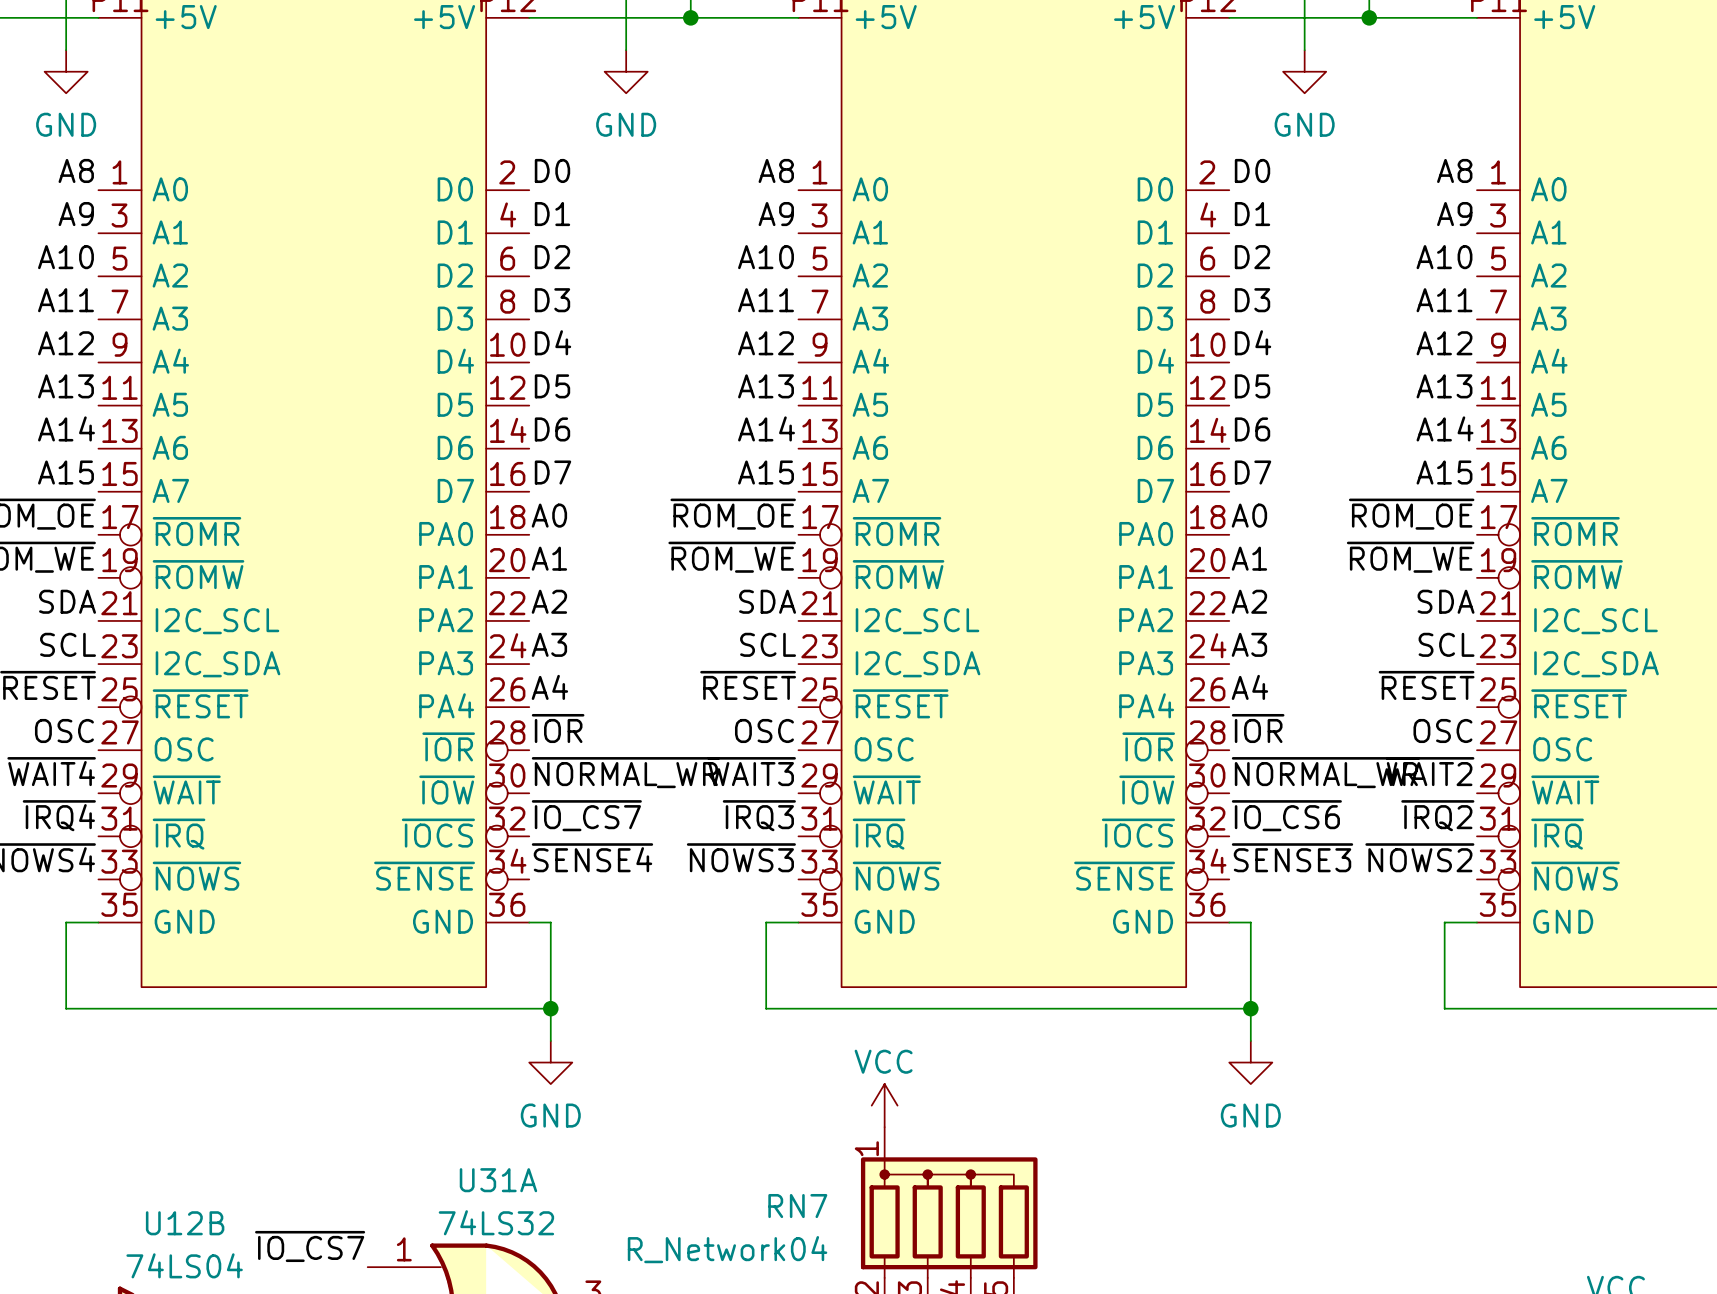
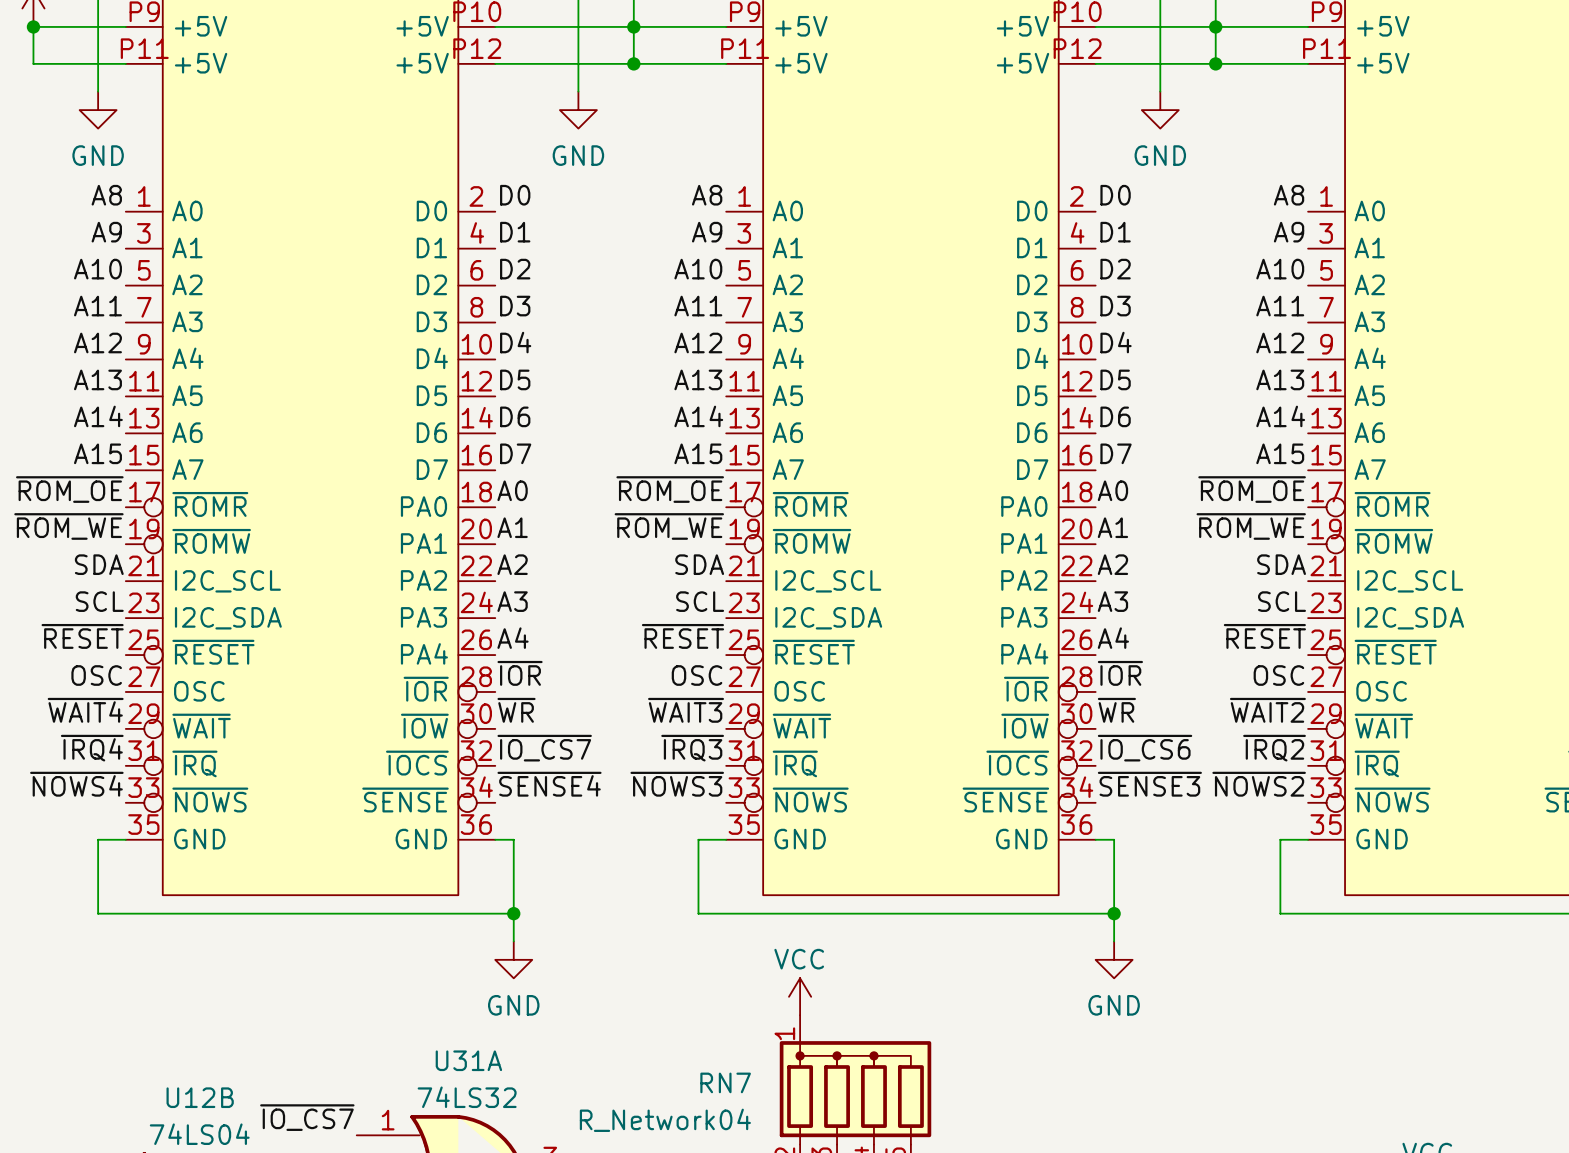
label: ~{NORMAL_WR} (625, 772) -> ~{WR} (516, 710)
label: ~{NORMAL_WR} (1325, 772) -> ~{WR} (1116, 710)

